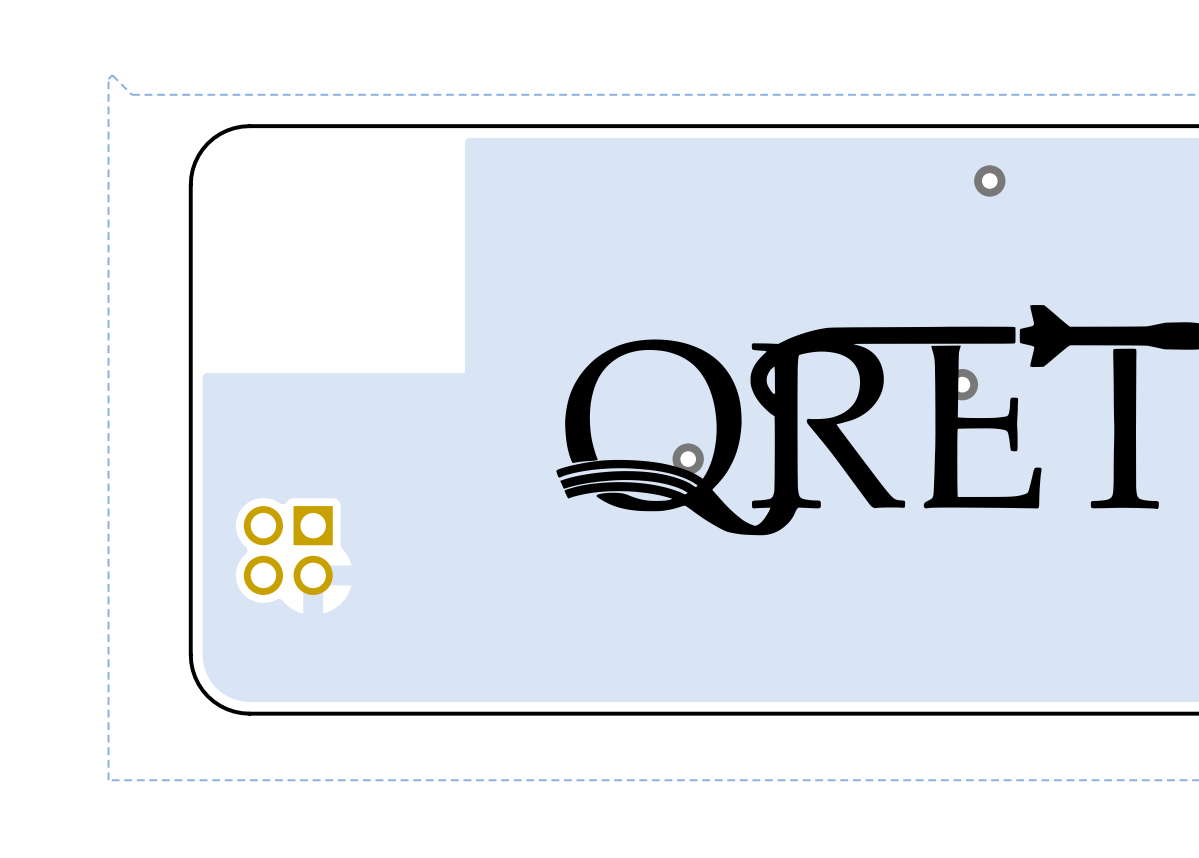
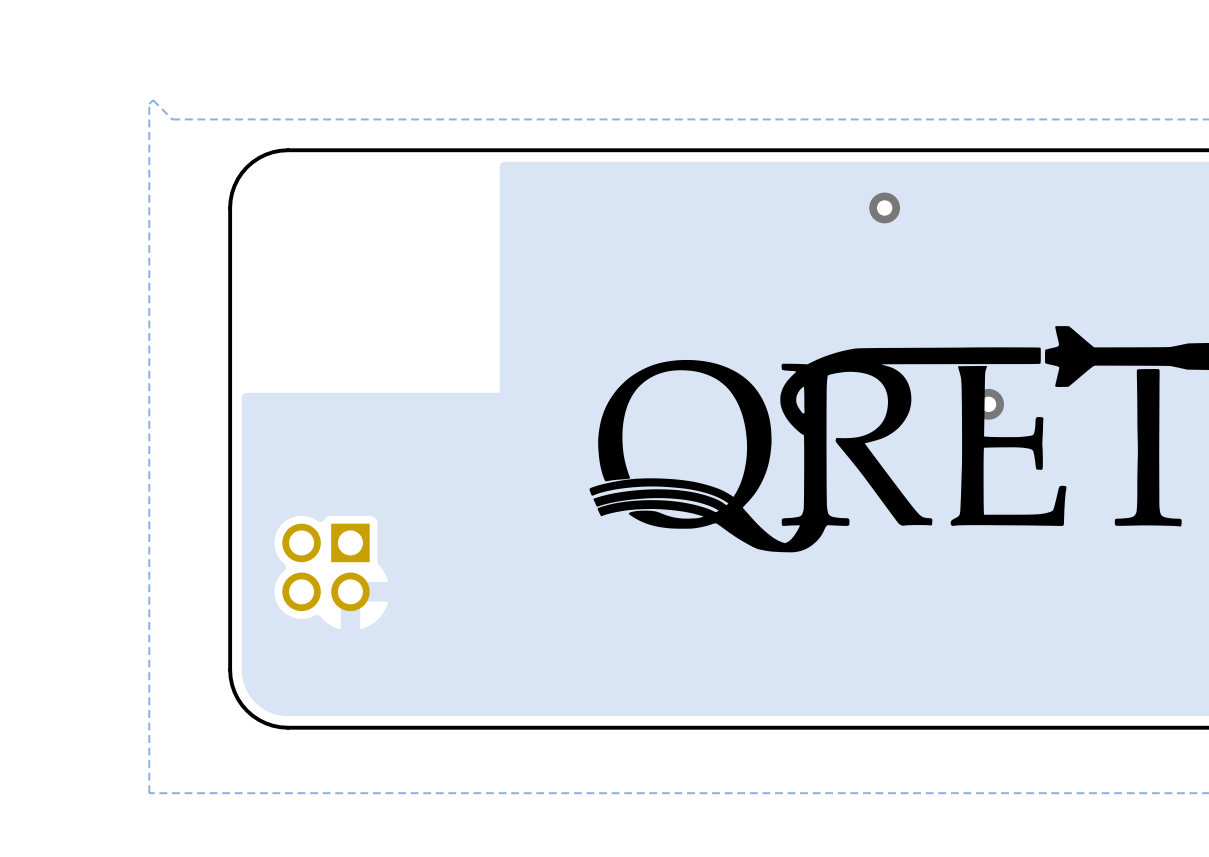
via position: (989, 180) -> (884, 207)
via: (688, 459) -> none

